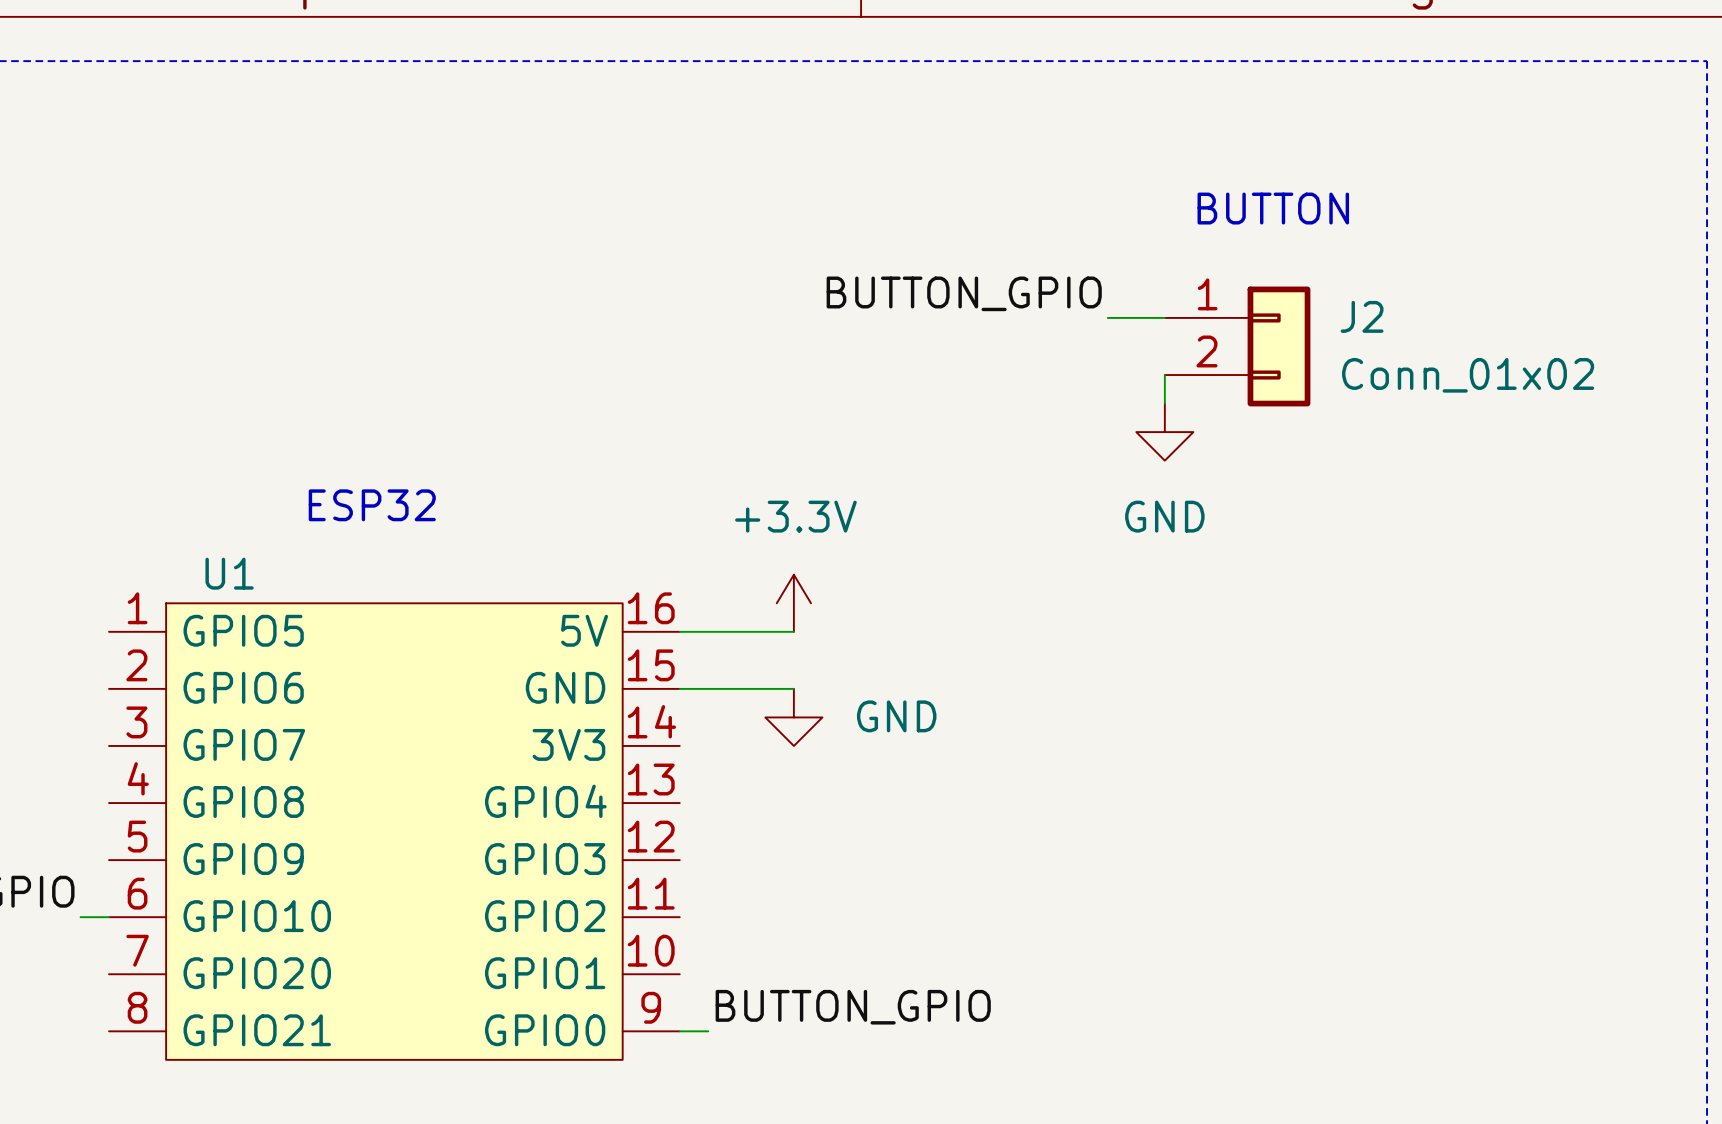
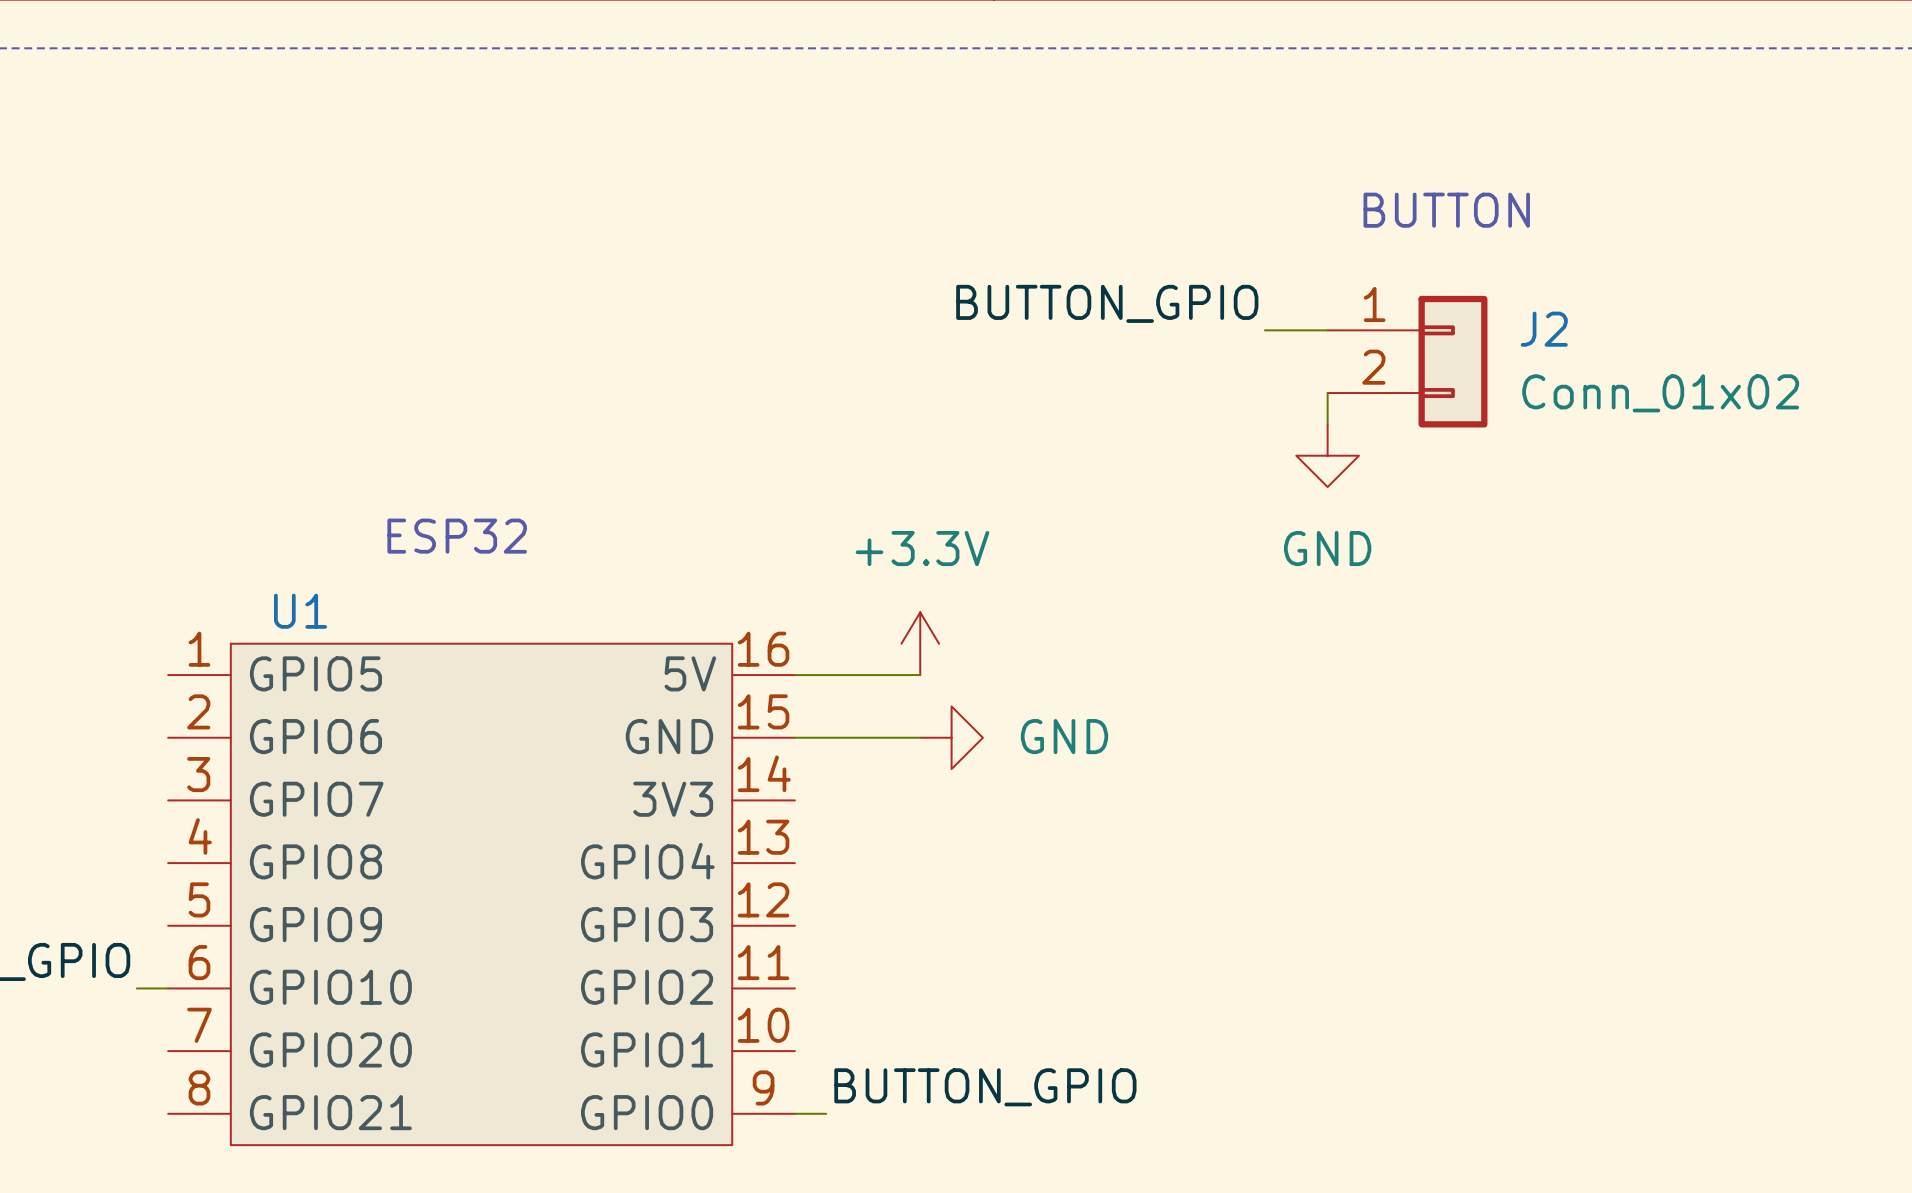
power symbol rotation: 0° (793, 717) -> 90° counterclockwise (951, 737)
power symbol position: GND (793, 717) -> GND (951, 737)

